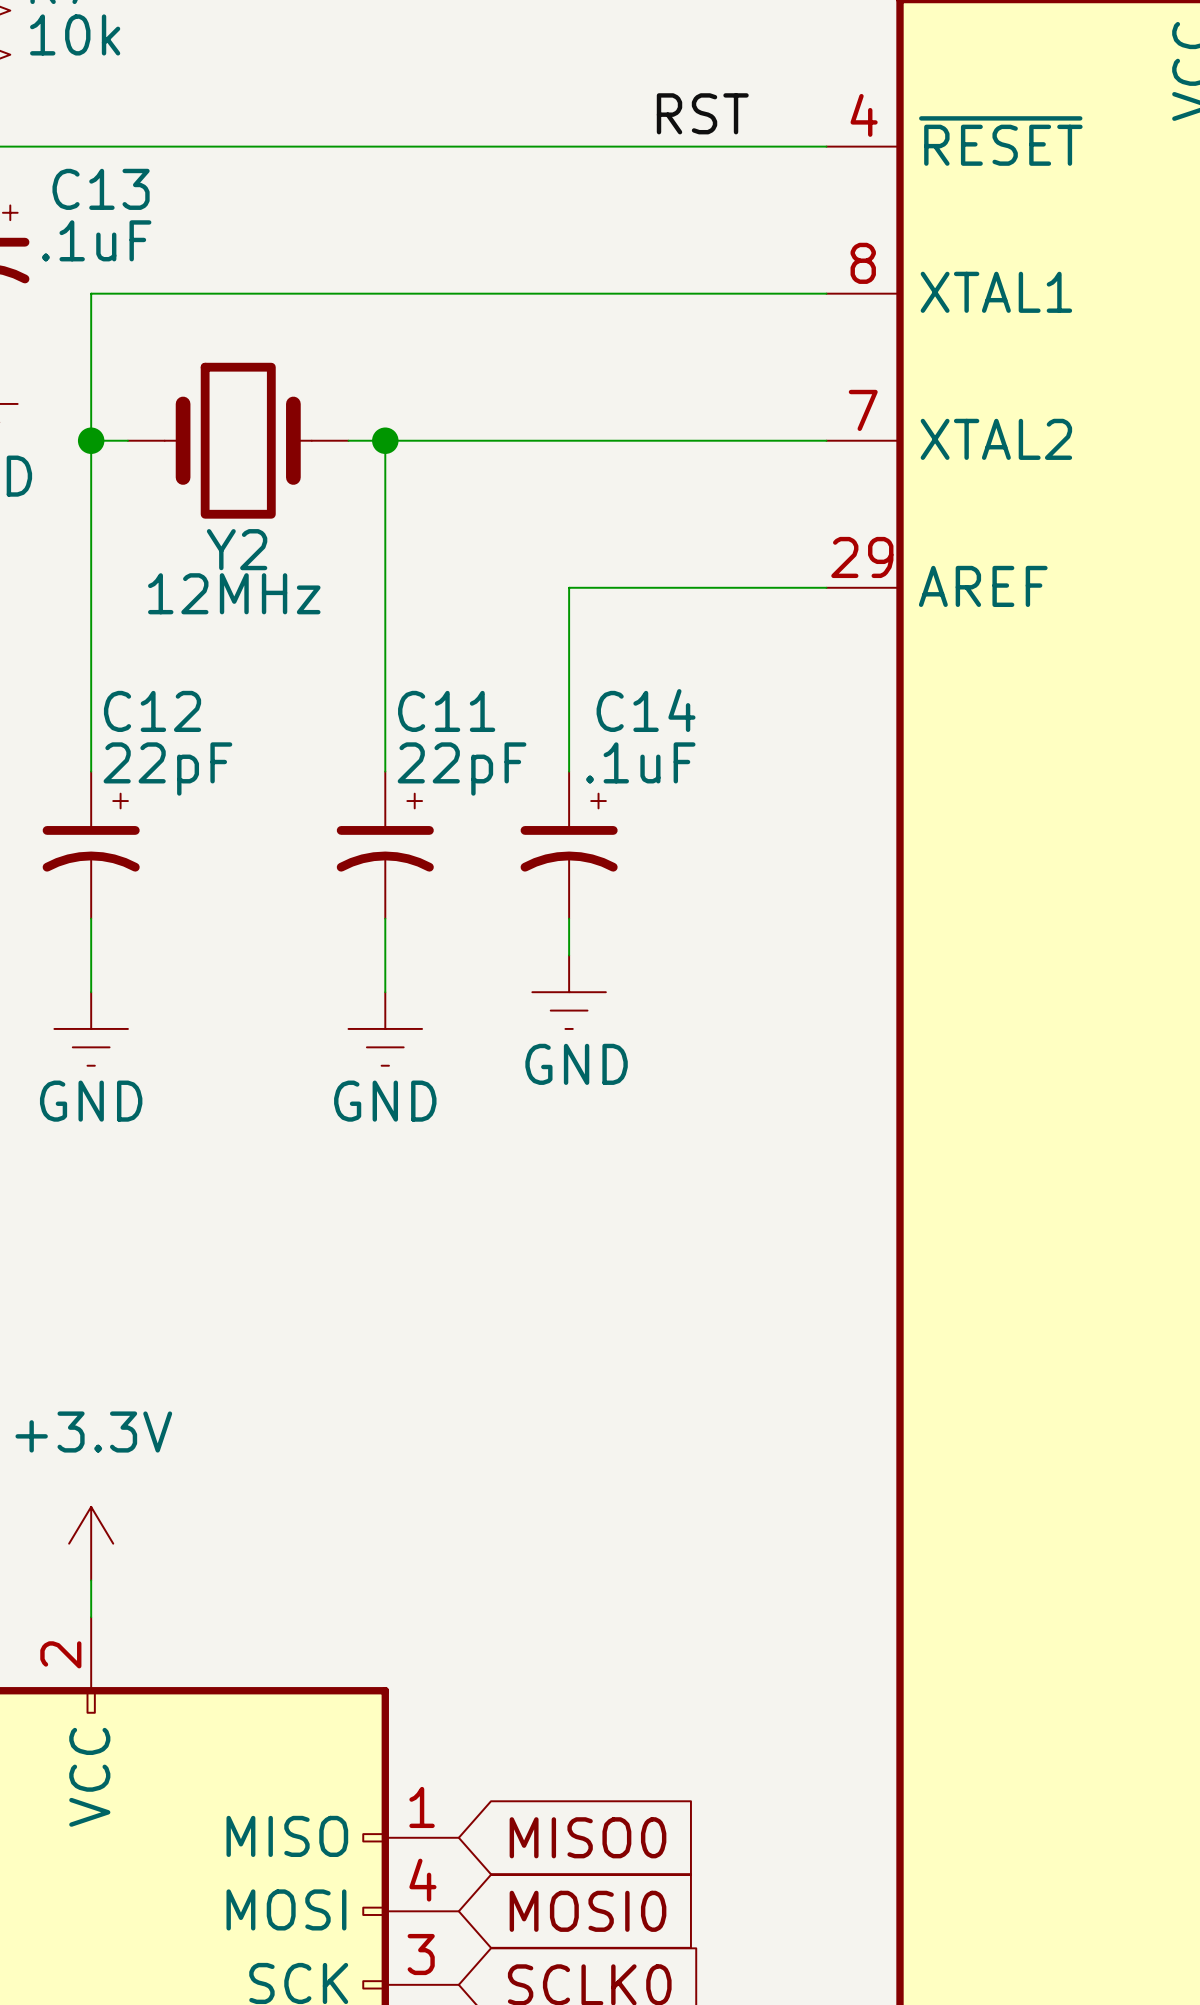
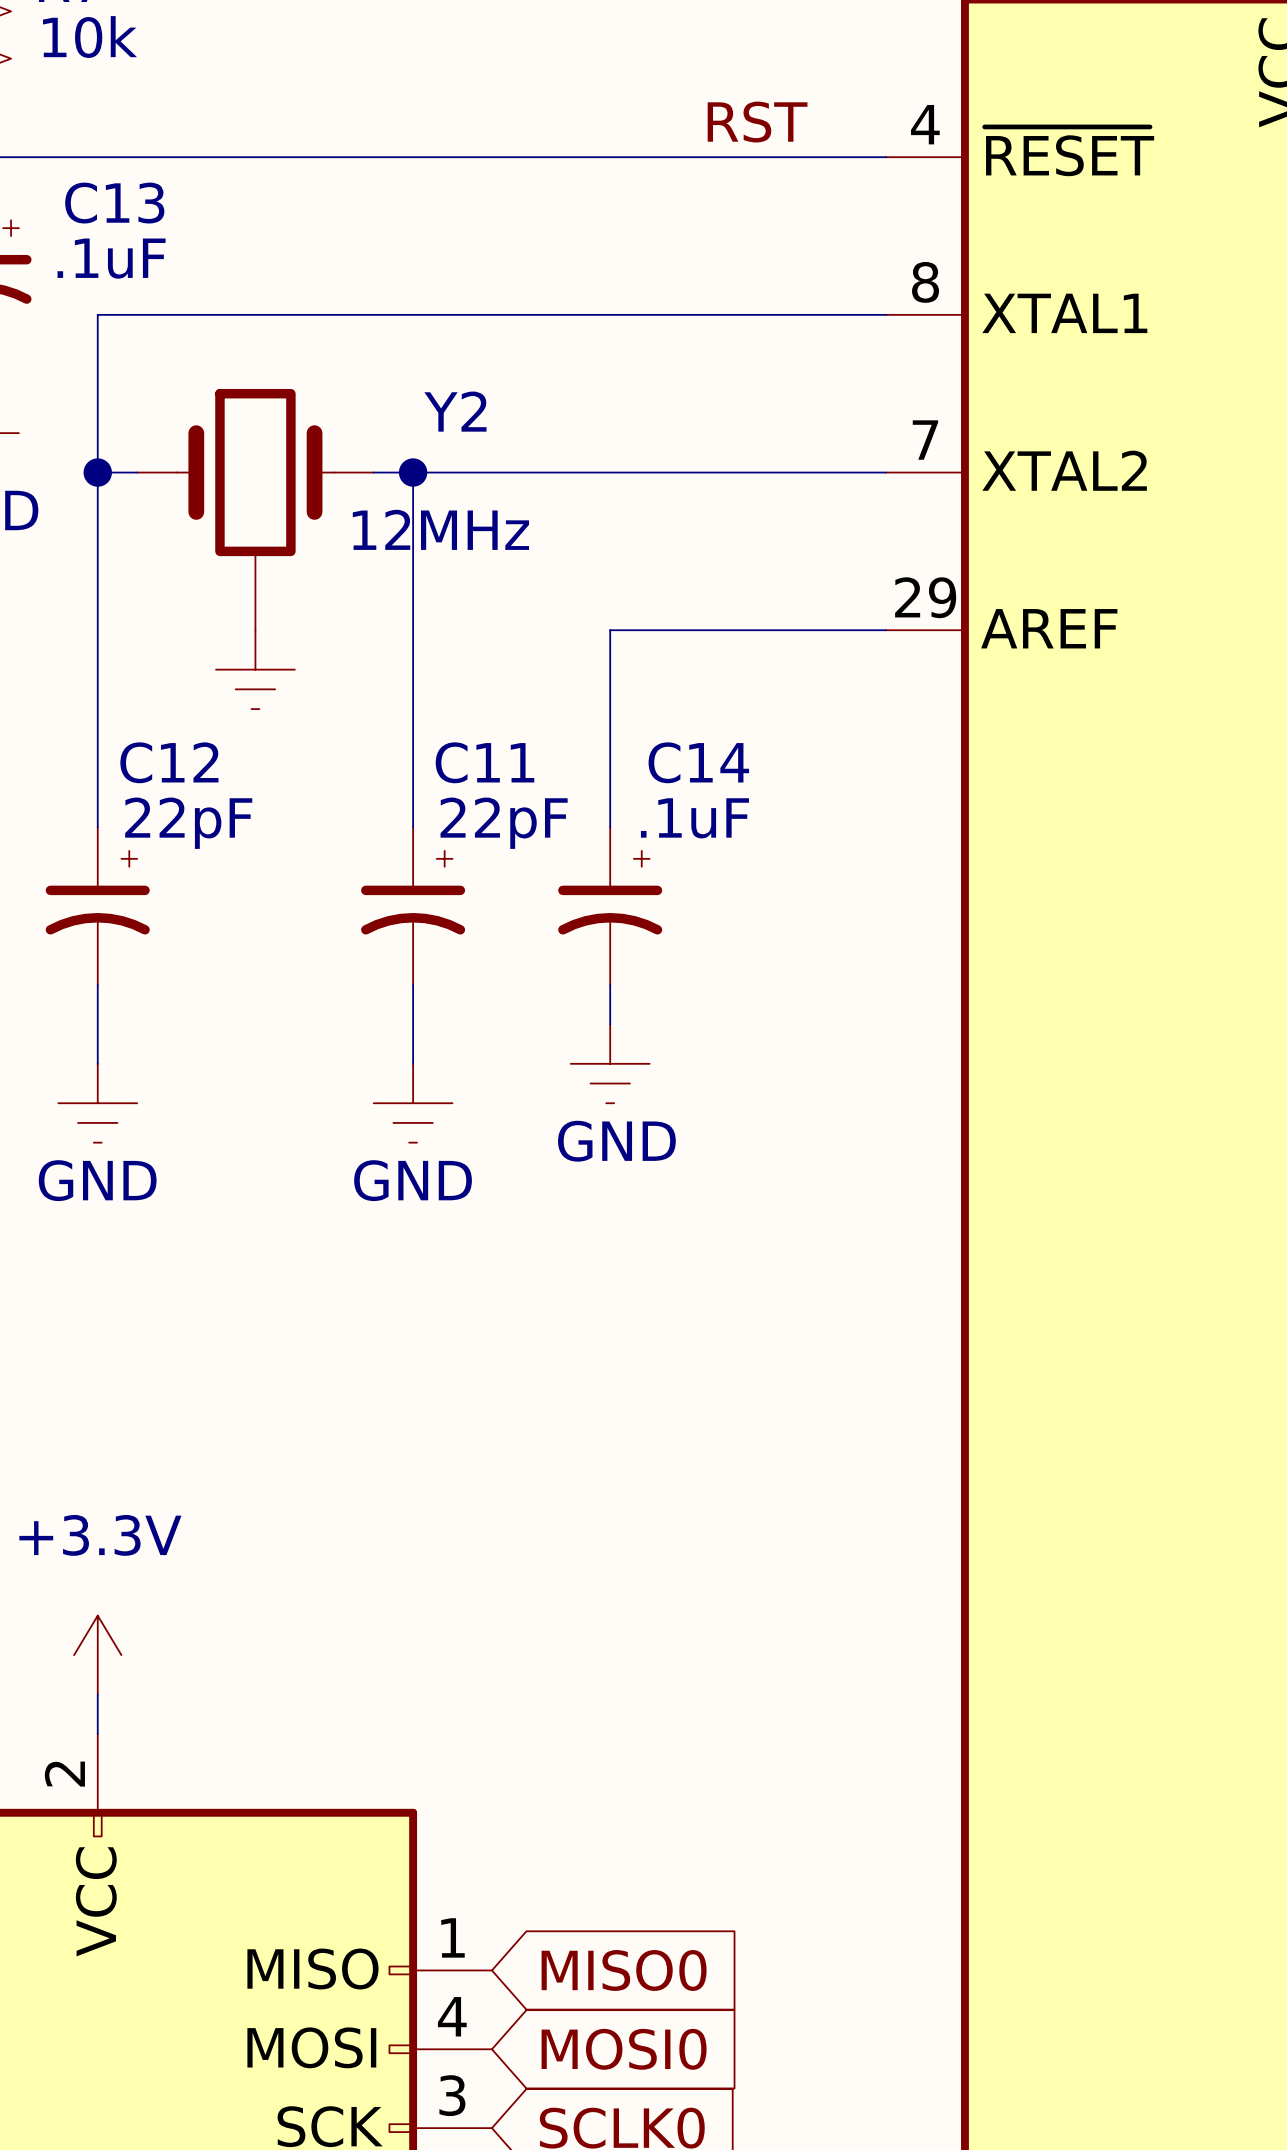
Y2 symbol: [127, 362, 349, 519] -> [137, 388, 374, 631]
Y2 name position: Y2 (237, 549) -> Y2 (455, 411)
Y2 value position: 12MHz (234, 593) -> 12MHz (440, 529)
power symbol: none -> (255, 669)

